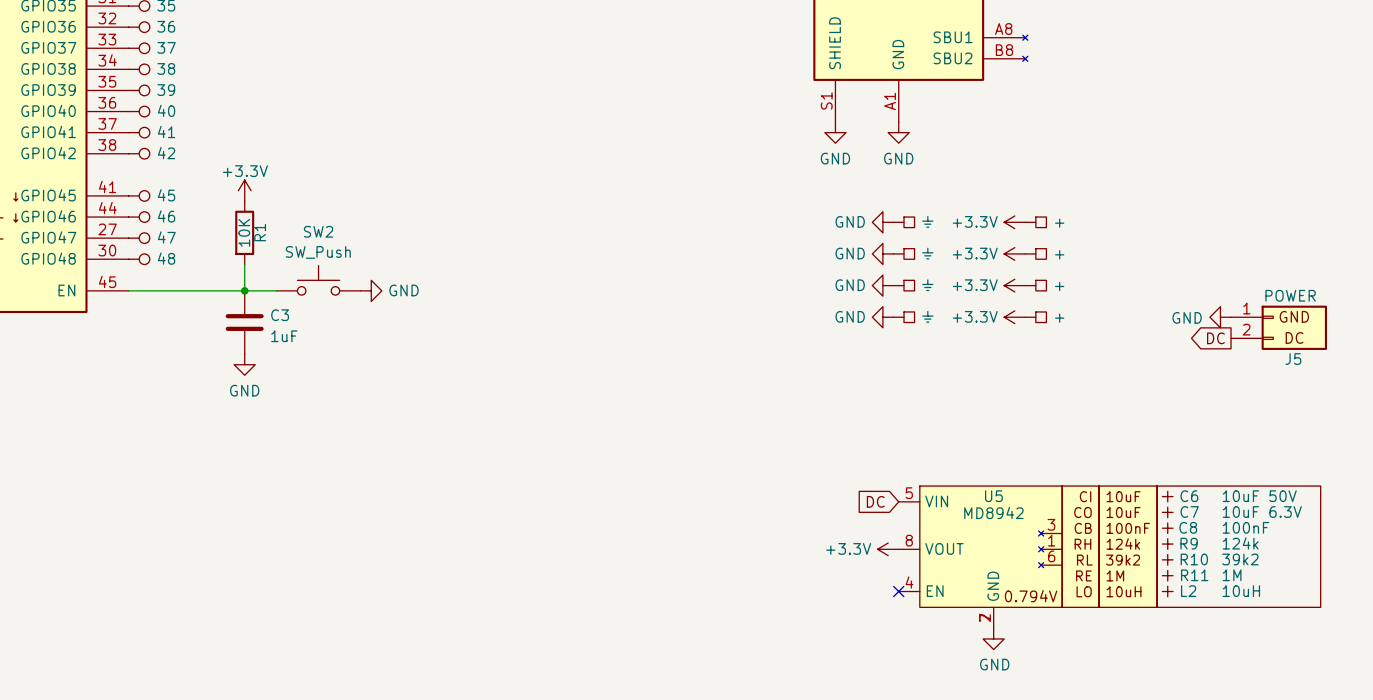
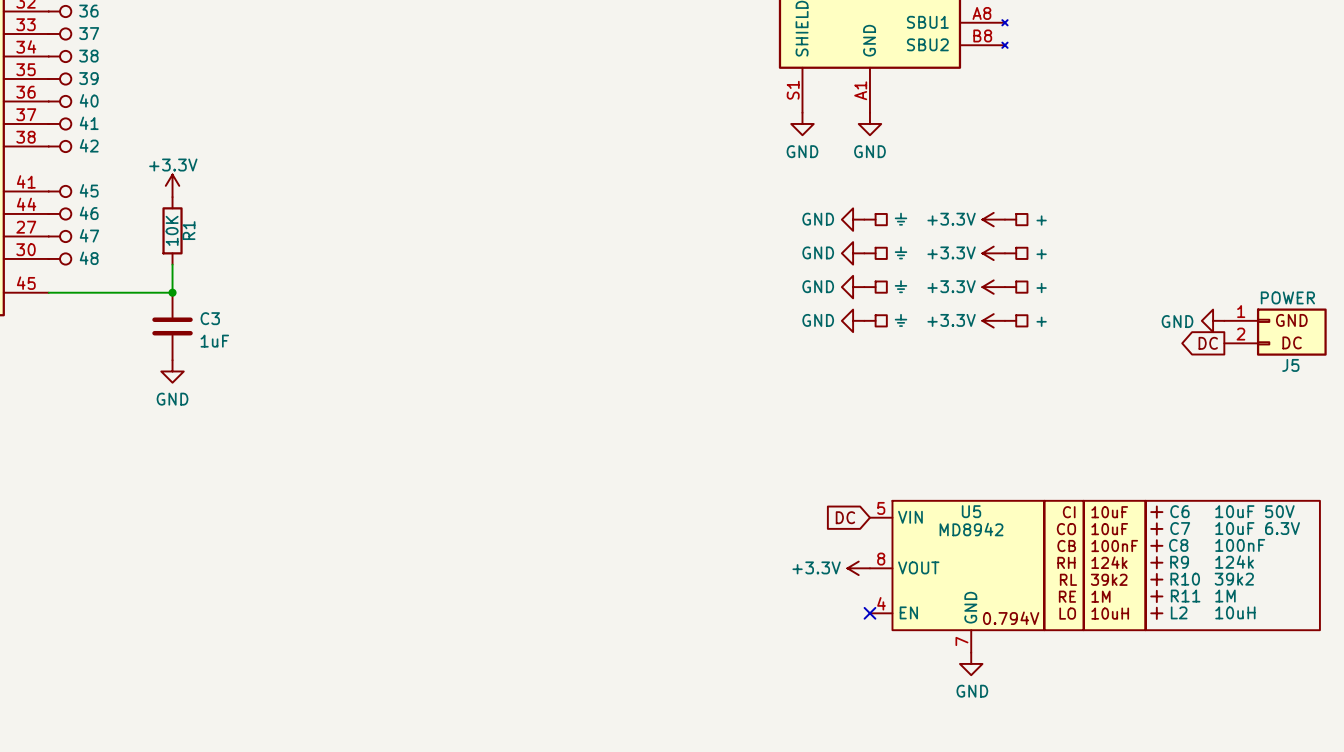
SW2: SW_Push (318, 280) -> none
wire: (244, 290) (276, 290) -> none
power symbol: GND (371, 290) -> none
U5 symbol: [898, 486, 1321, 629] -> [869, 500, 1320, 653]

